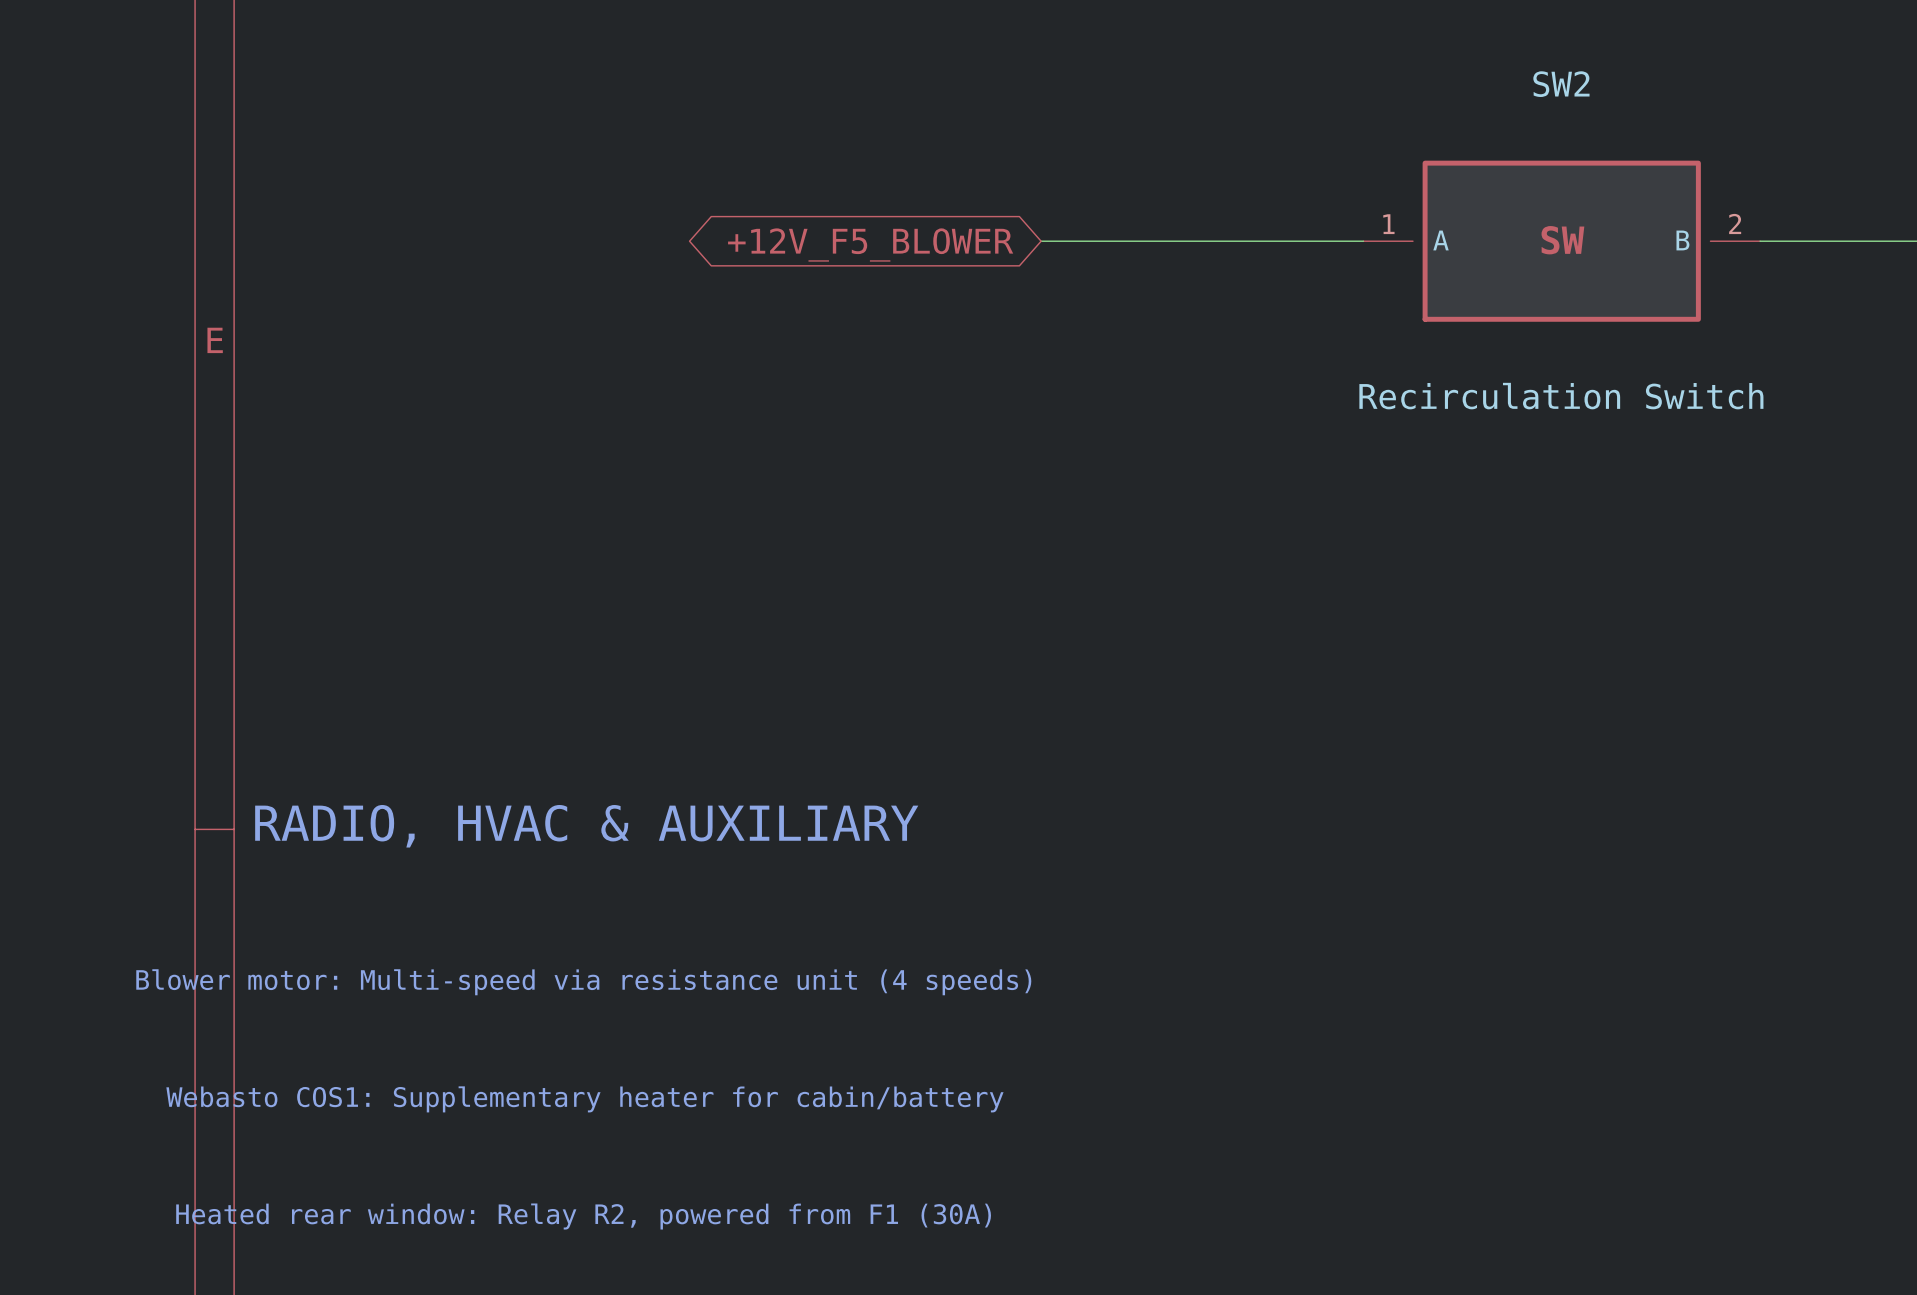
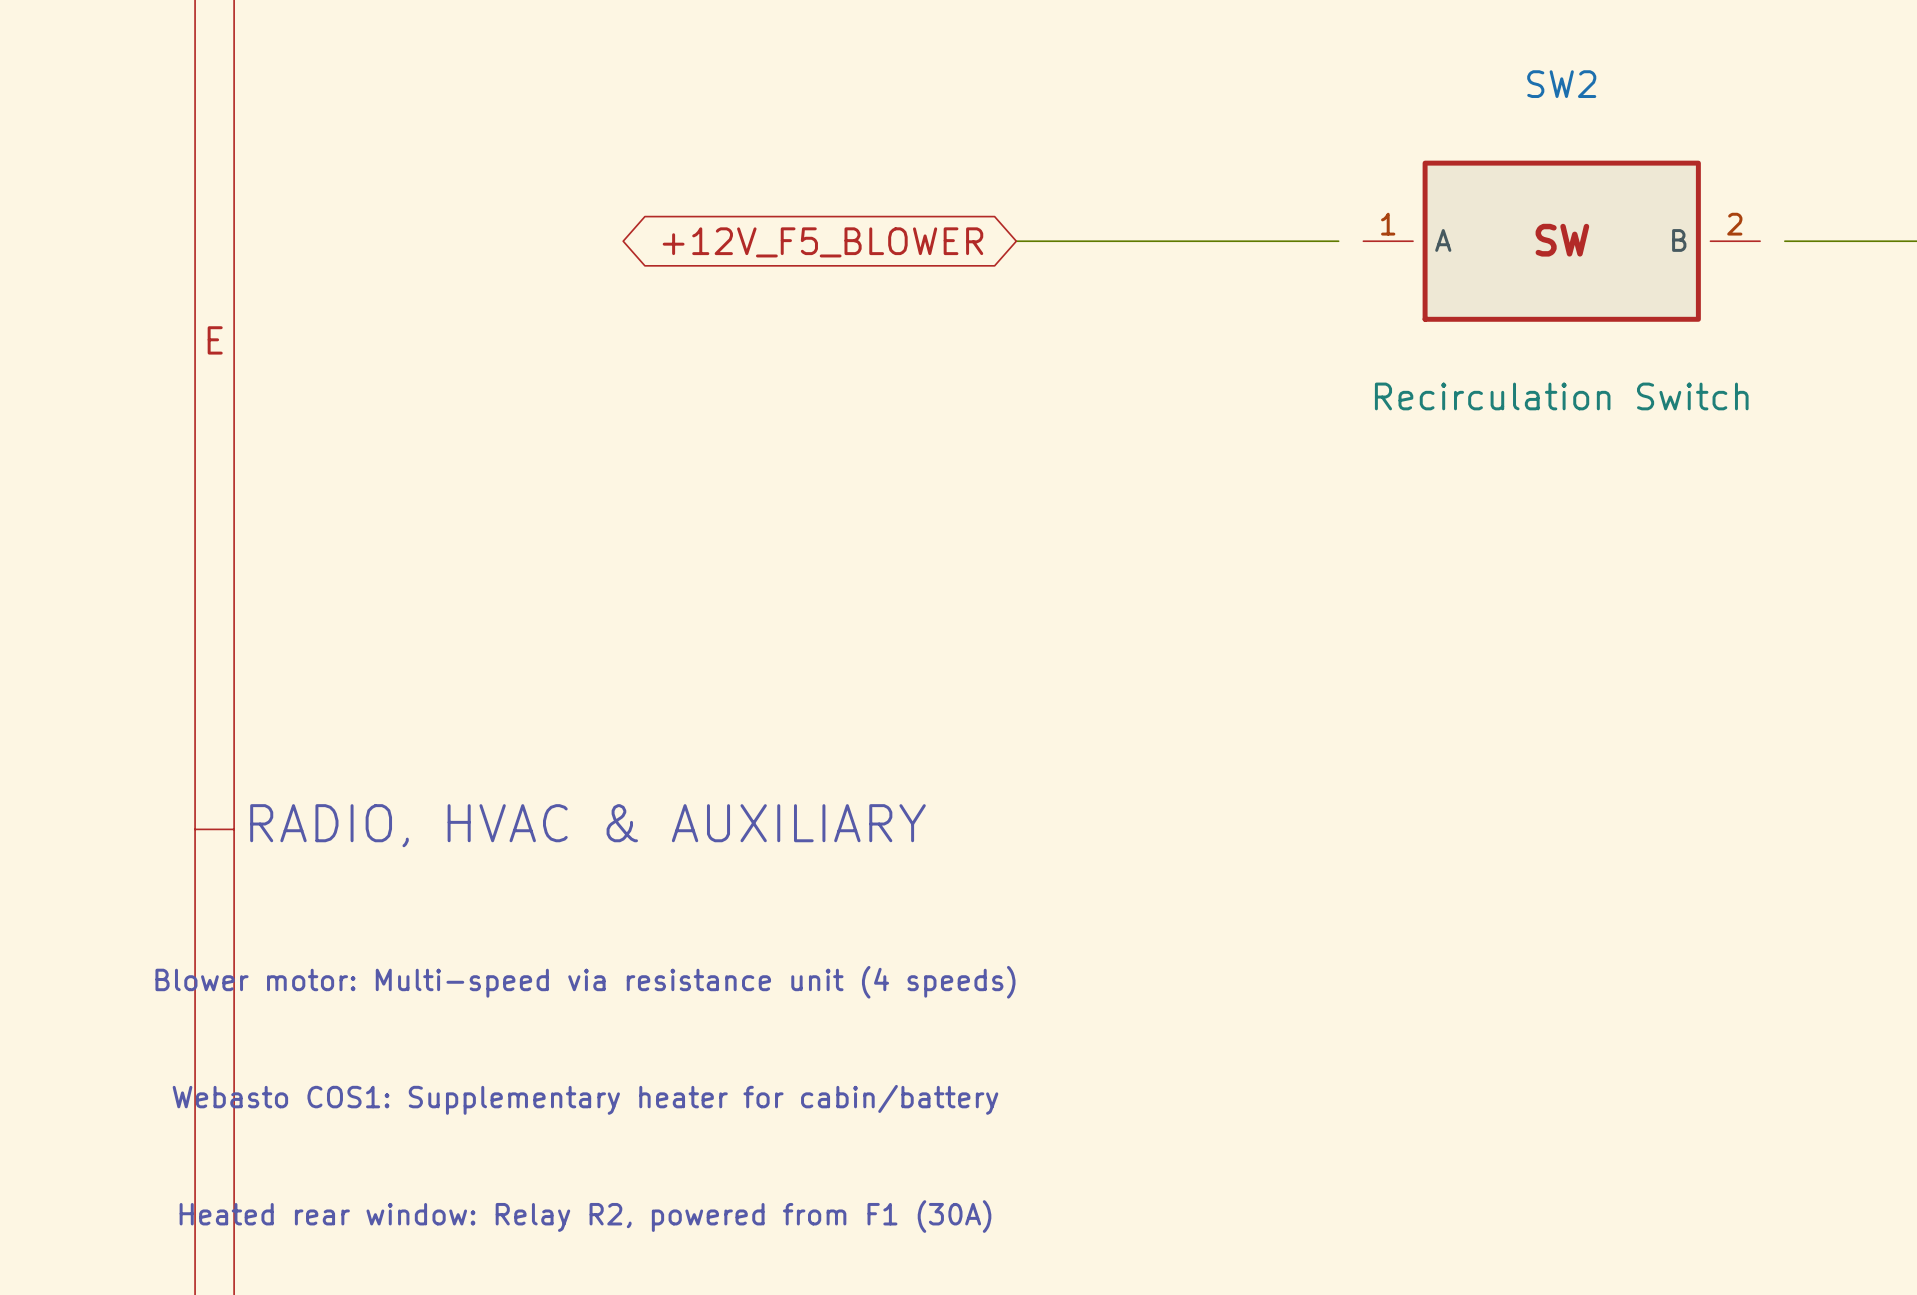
wire: (1338, 241) (1363, 241) -> (1016, 241) (1041, 241)
wire: (1760, 241) (1784, 241) -> none
global label position: +12V_F5_BLOWER (870, 245) -> +12V_F5_BLOWER (822, 242)

